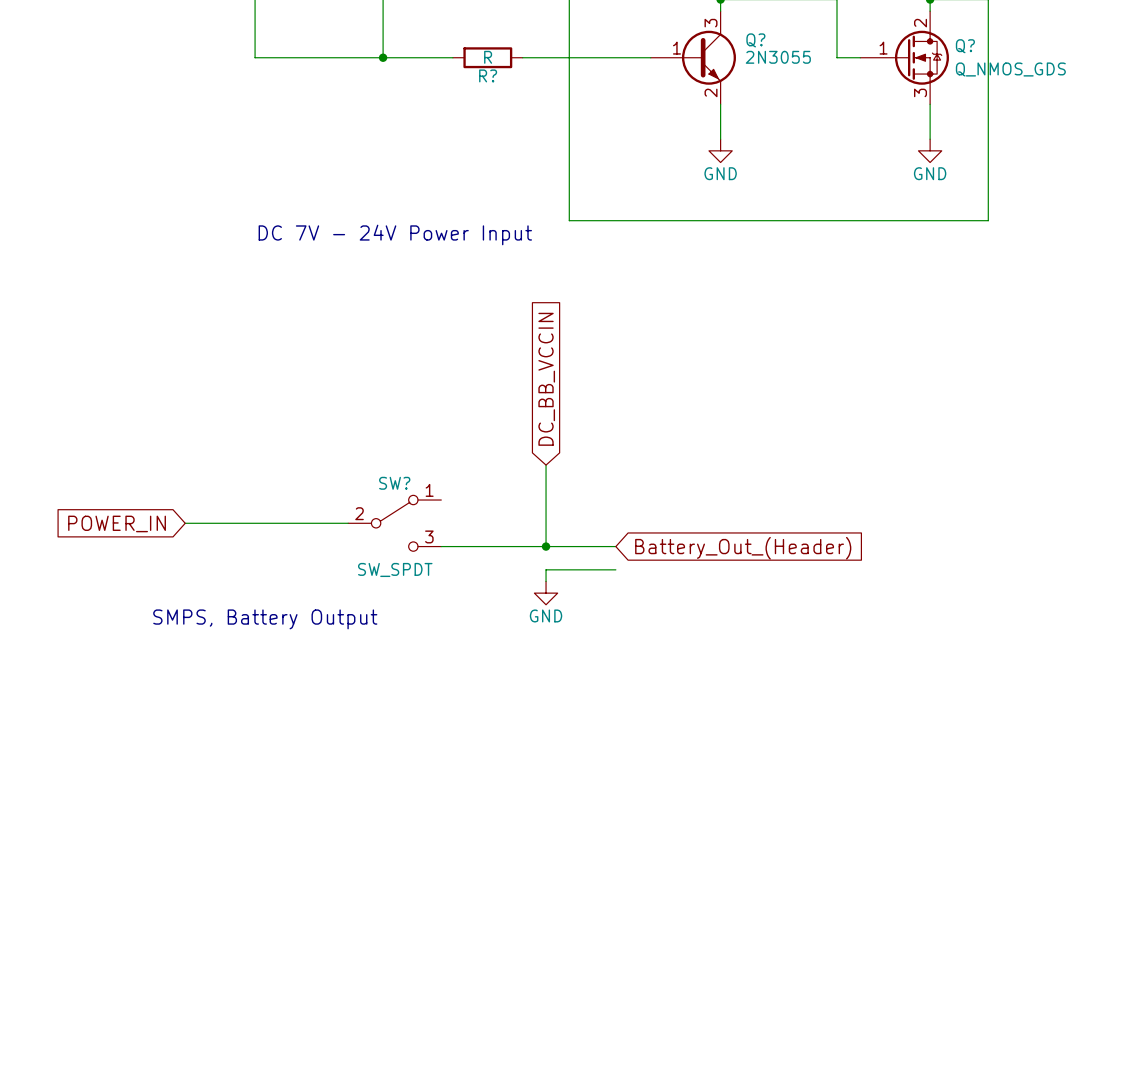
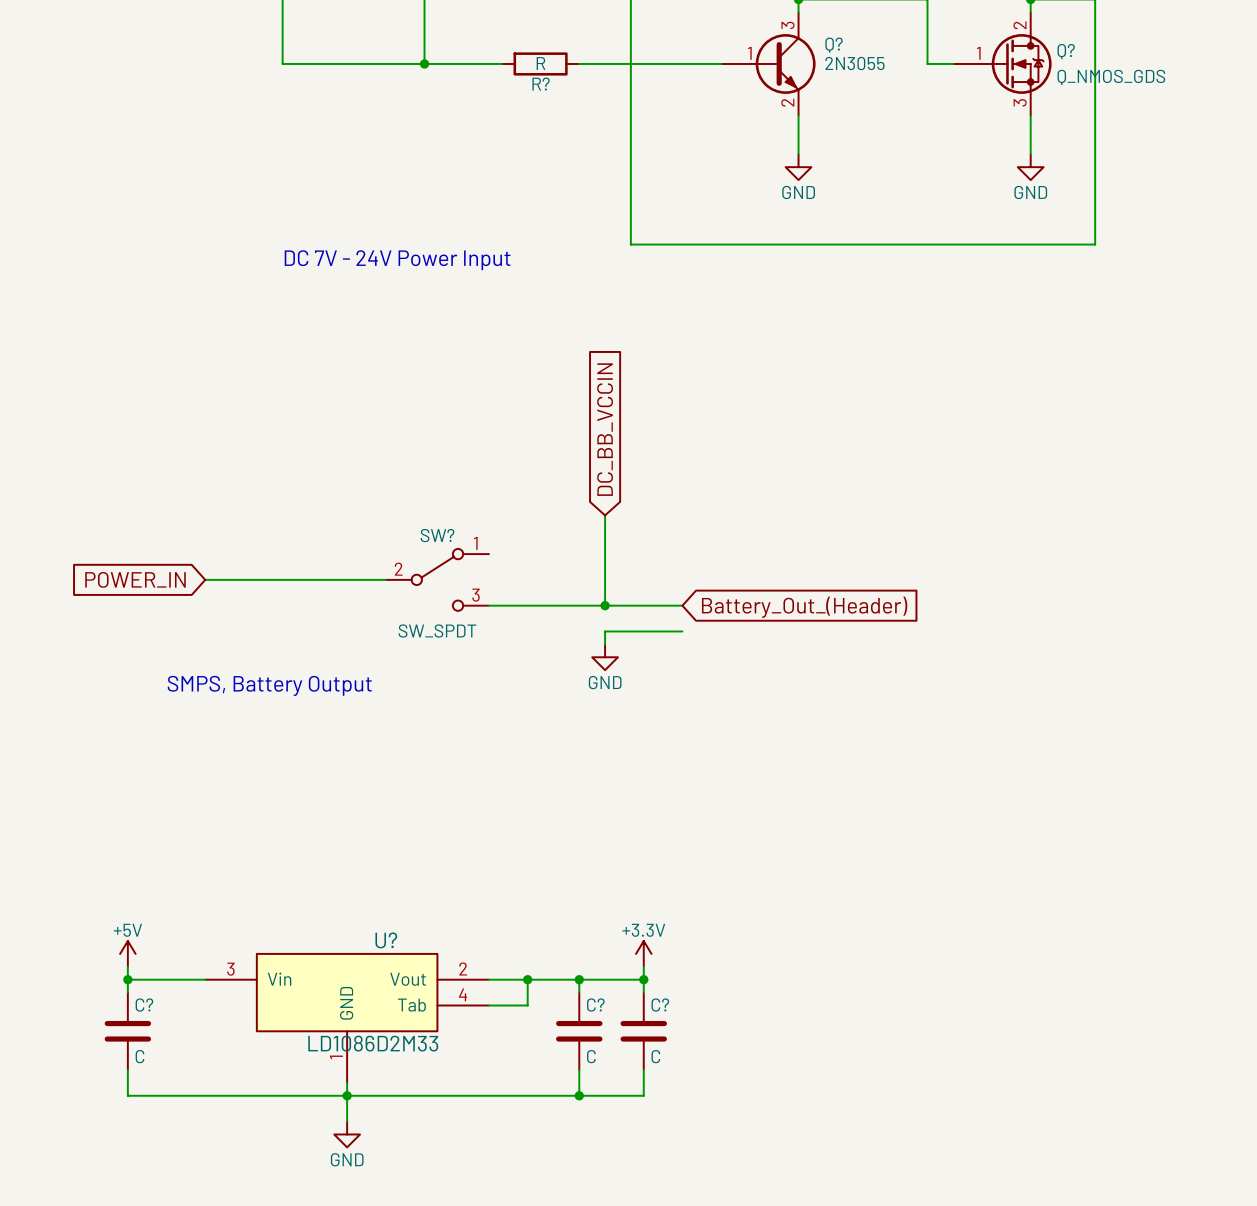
power symbol: none -> +5V (127, 953)
power symbol: none -> +3.3V (643, 953)
wire: none -> (127, 966) (127, 992)
wire: none -> (643, 966) (643, 992)
wire: none -> (127, 979) (205, 979)
junction: none -> (127, 979)
wire: none -> (489, 979) (643, 979)
wire: none -> (527, 979) (527, 1005) (489, 1005)
junction: none -> (527, 979)
wire: none -> (579, 979) (579, 992)
junction: none -> (579, 979)
junction: none -> (643, 979)
U?: none -> LD1086D2M33 (347, 1018)
C?: none -> C (127, 1031)
C?: none -> C (579, 1031)
C?: none -> C (643, 1031)
wire: none -> (127, 1069) (127, 1095) (643, 1095) (643, 1069)
wire: none -> (579, 1069) (579, 1095)
wire: none -> (347, 1082) (347, 1121)
junction: none -> (347, 1095)
junction: none -> (579, 1095)
power symbol: none -> GND (347, 1134)

